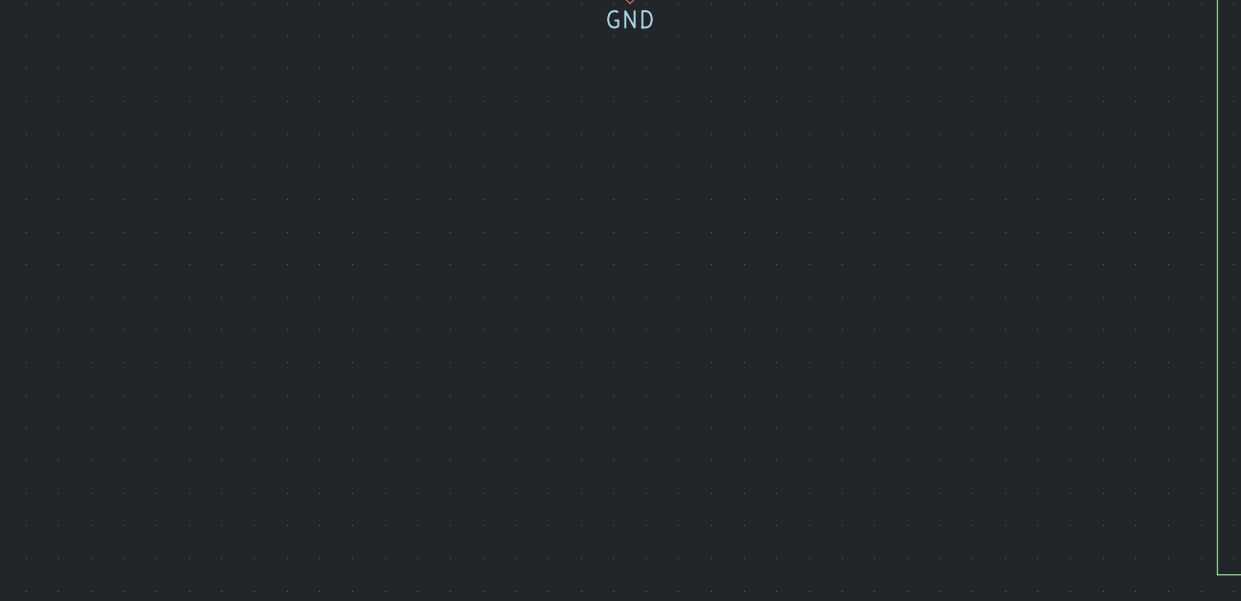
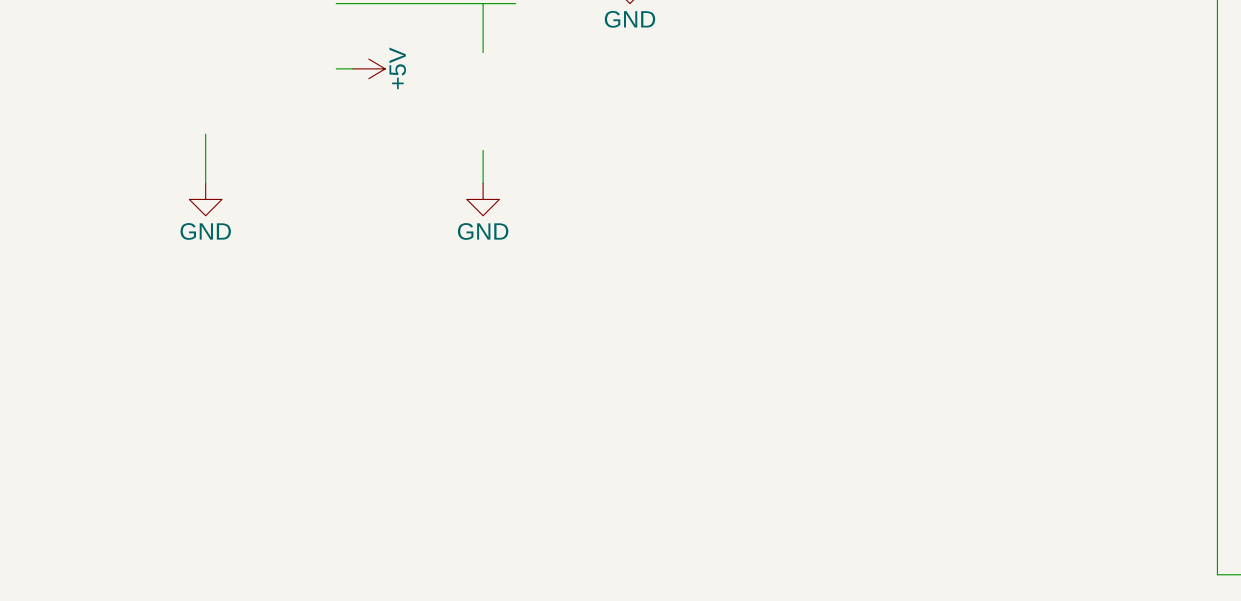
wire: none -> (336, 3) (515, 3)
wire: none -> (483, 3) (483, 52)
wire: none -> (336, 68) (352, 68)
power symbol: none -> +5V (368, 68)
wire: none -> (205, 134) (205, 183)
wire: none -> (483, 150) (483, 183)
power symbol: none -> GND (205, 199)
power symbol: none -> GND (483, 199)

